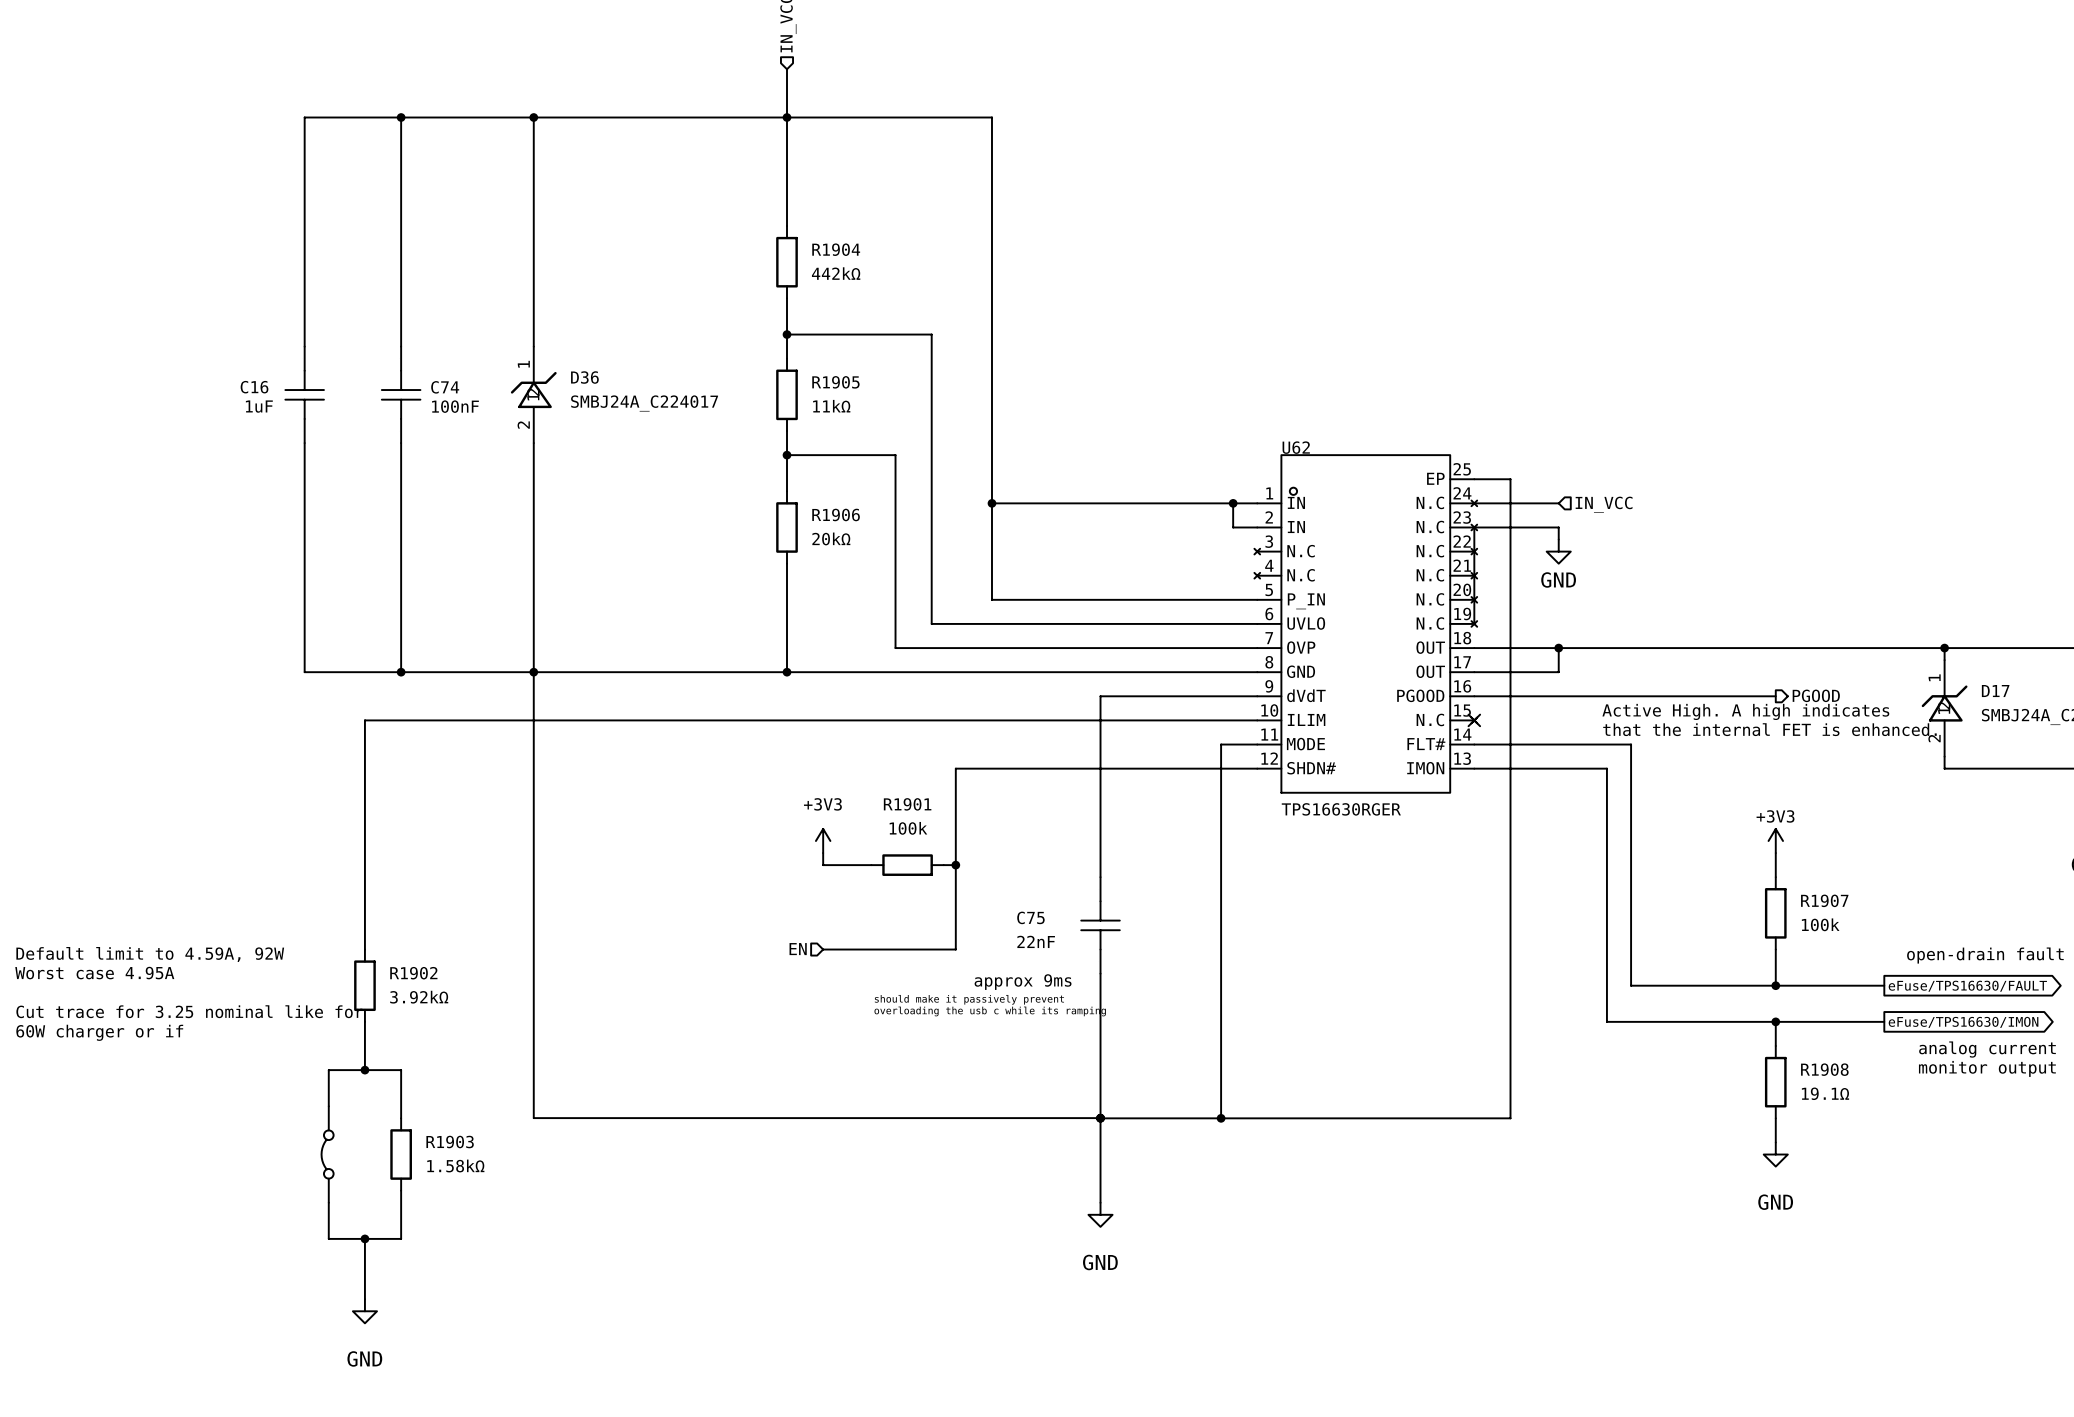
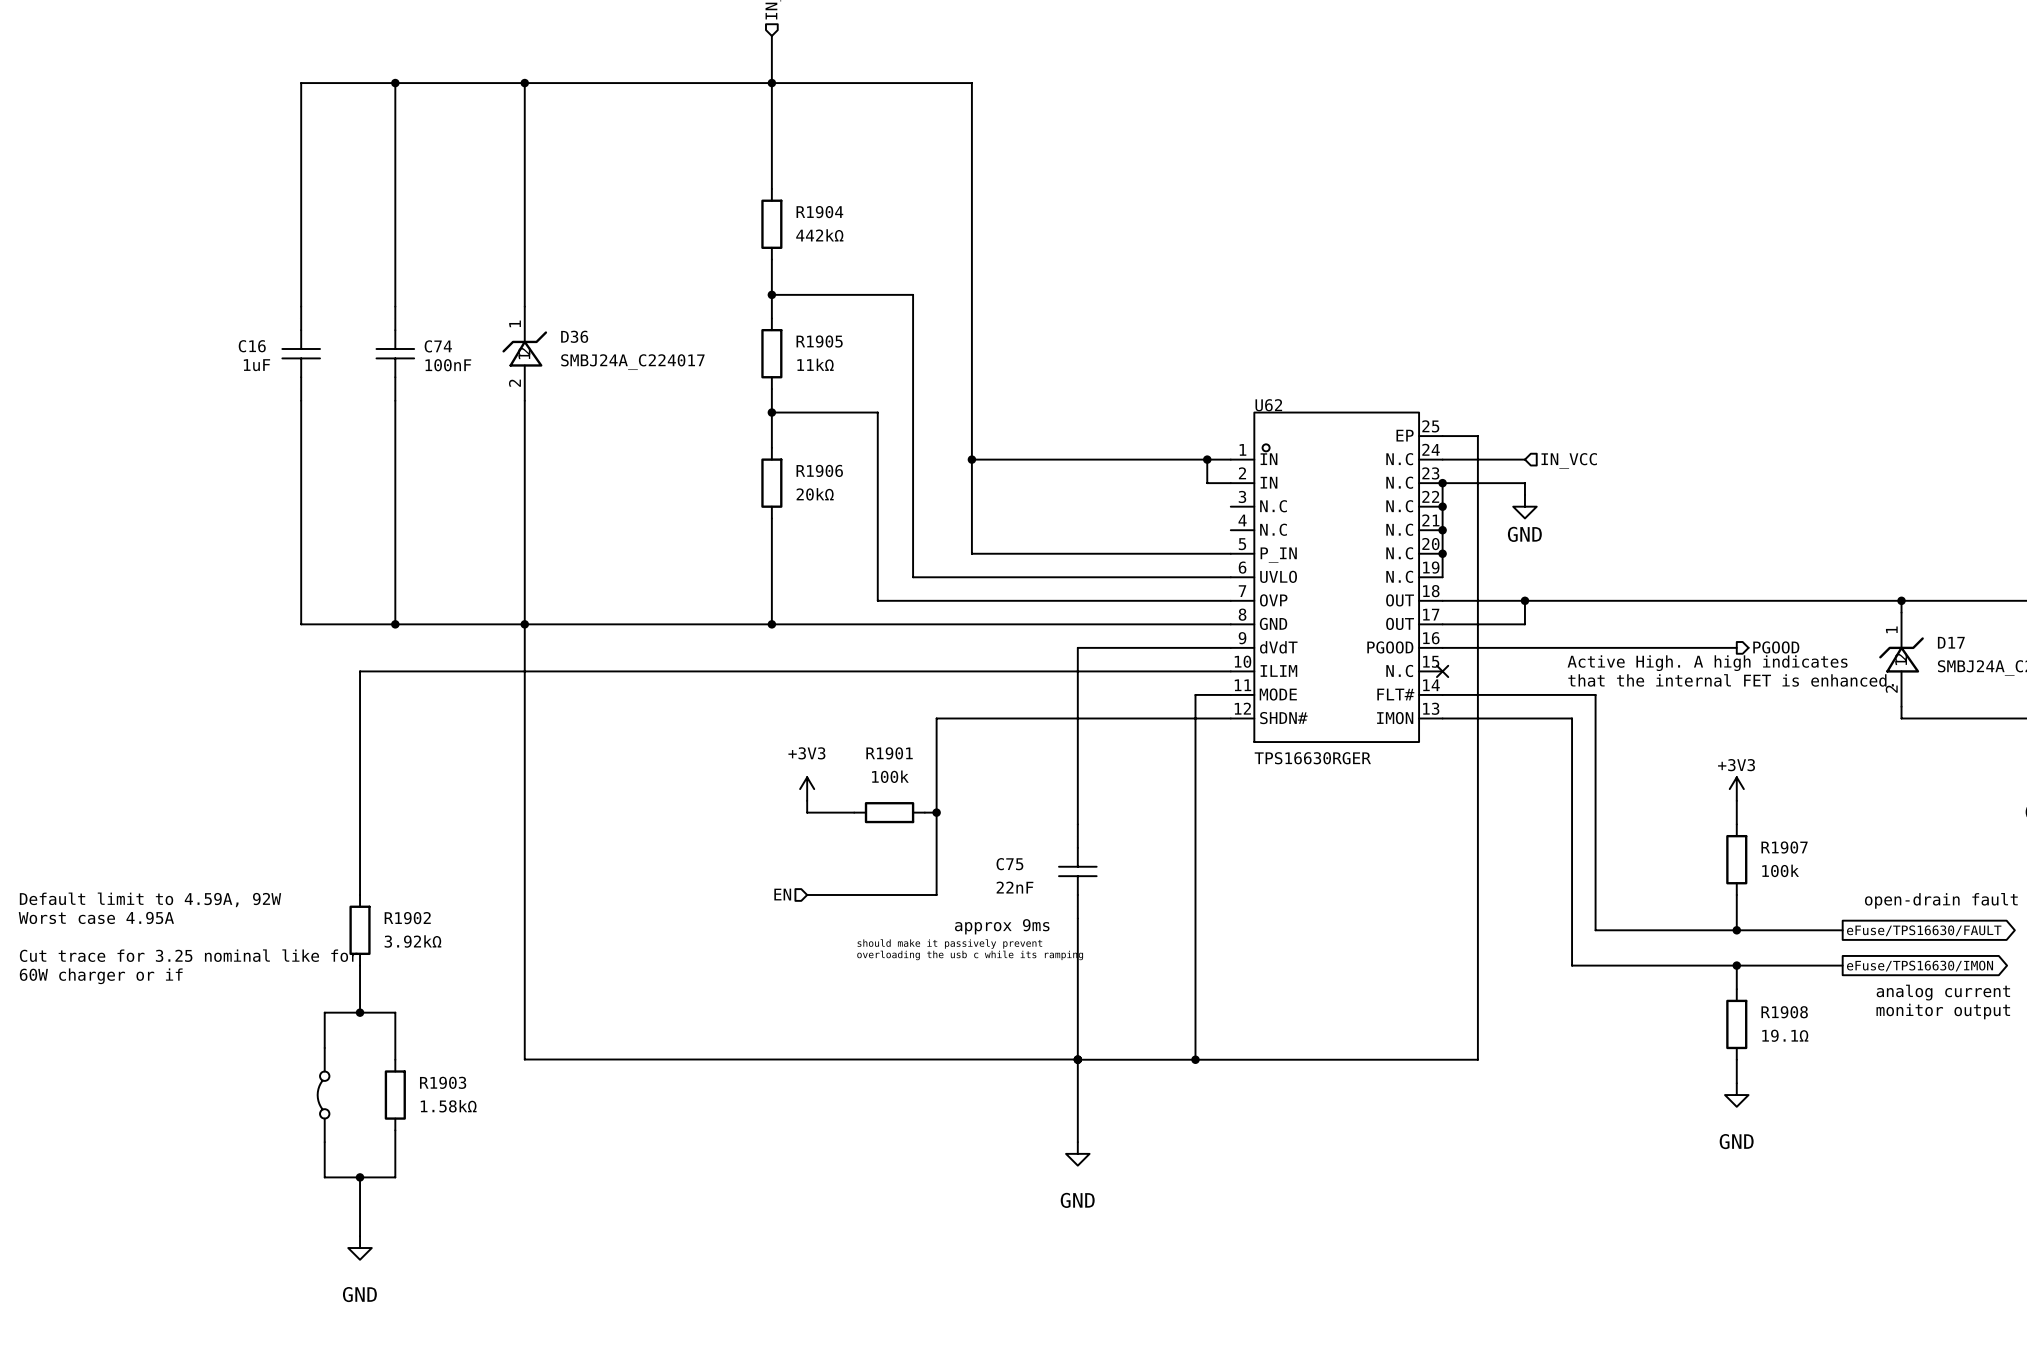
U62 symbol: [1254, 455, 1478, 793] -> [1230, 412, 1443, 743]
junction: none -> (1442, 483)
junction: none -> (1442, 506)
junction: none -> (1442, 530)
junction: none -> (1442, 553)

